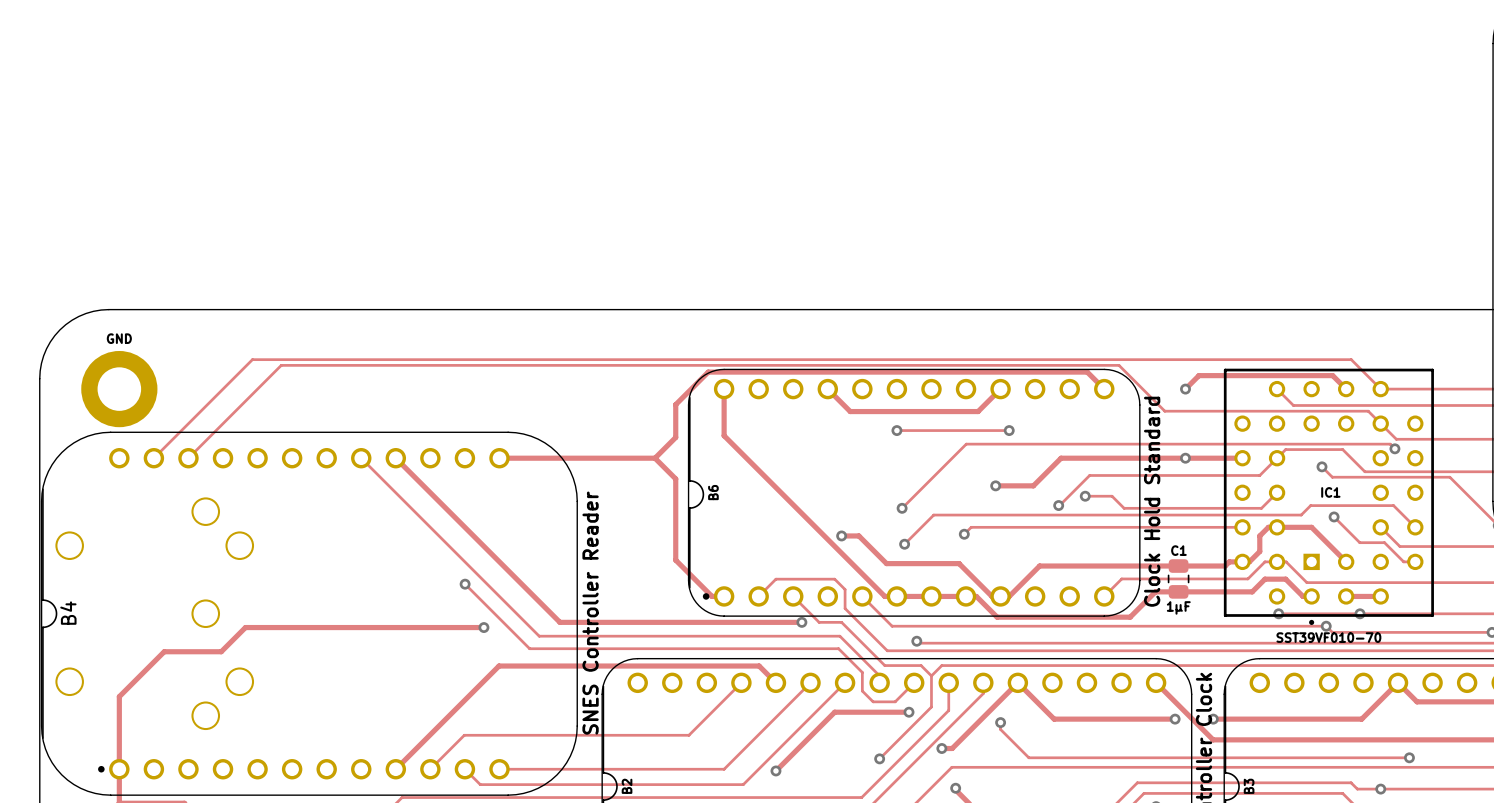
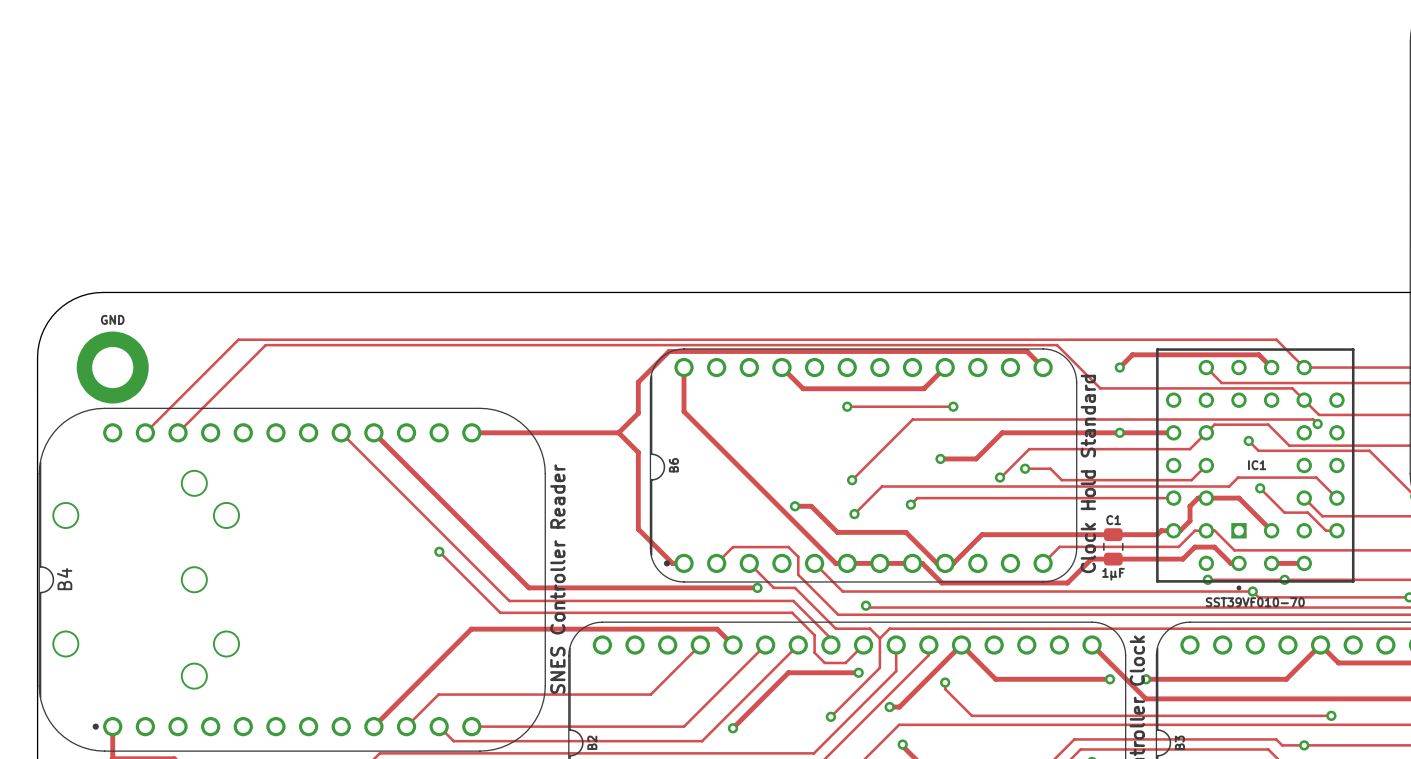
track: (483, 627) (245, 627) (221, 651) (164, 651) (119, 696) (119, 769) -> none
via: (483, 627) -> none

